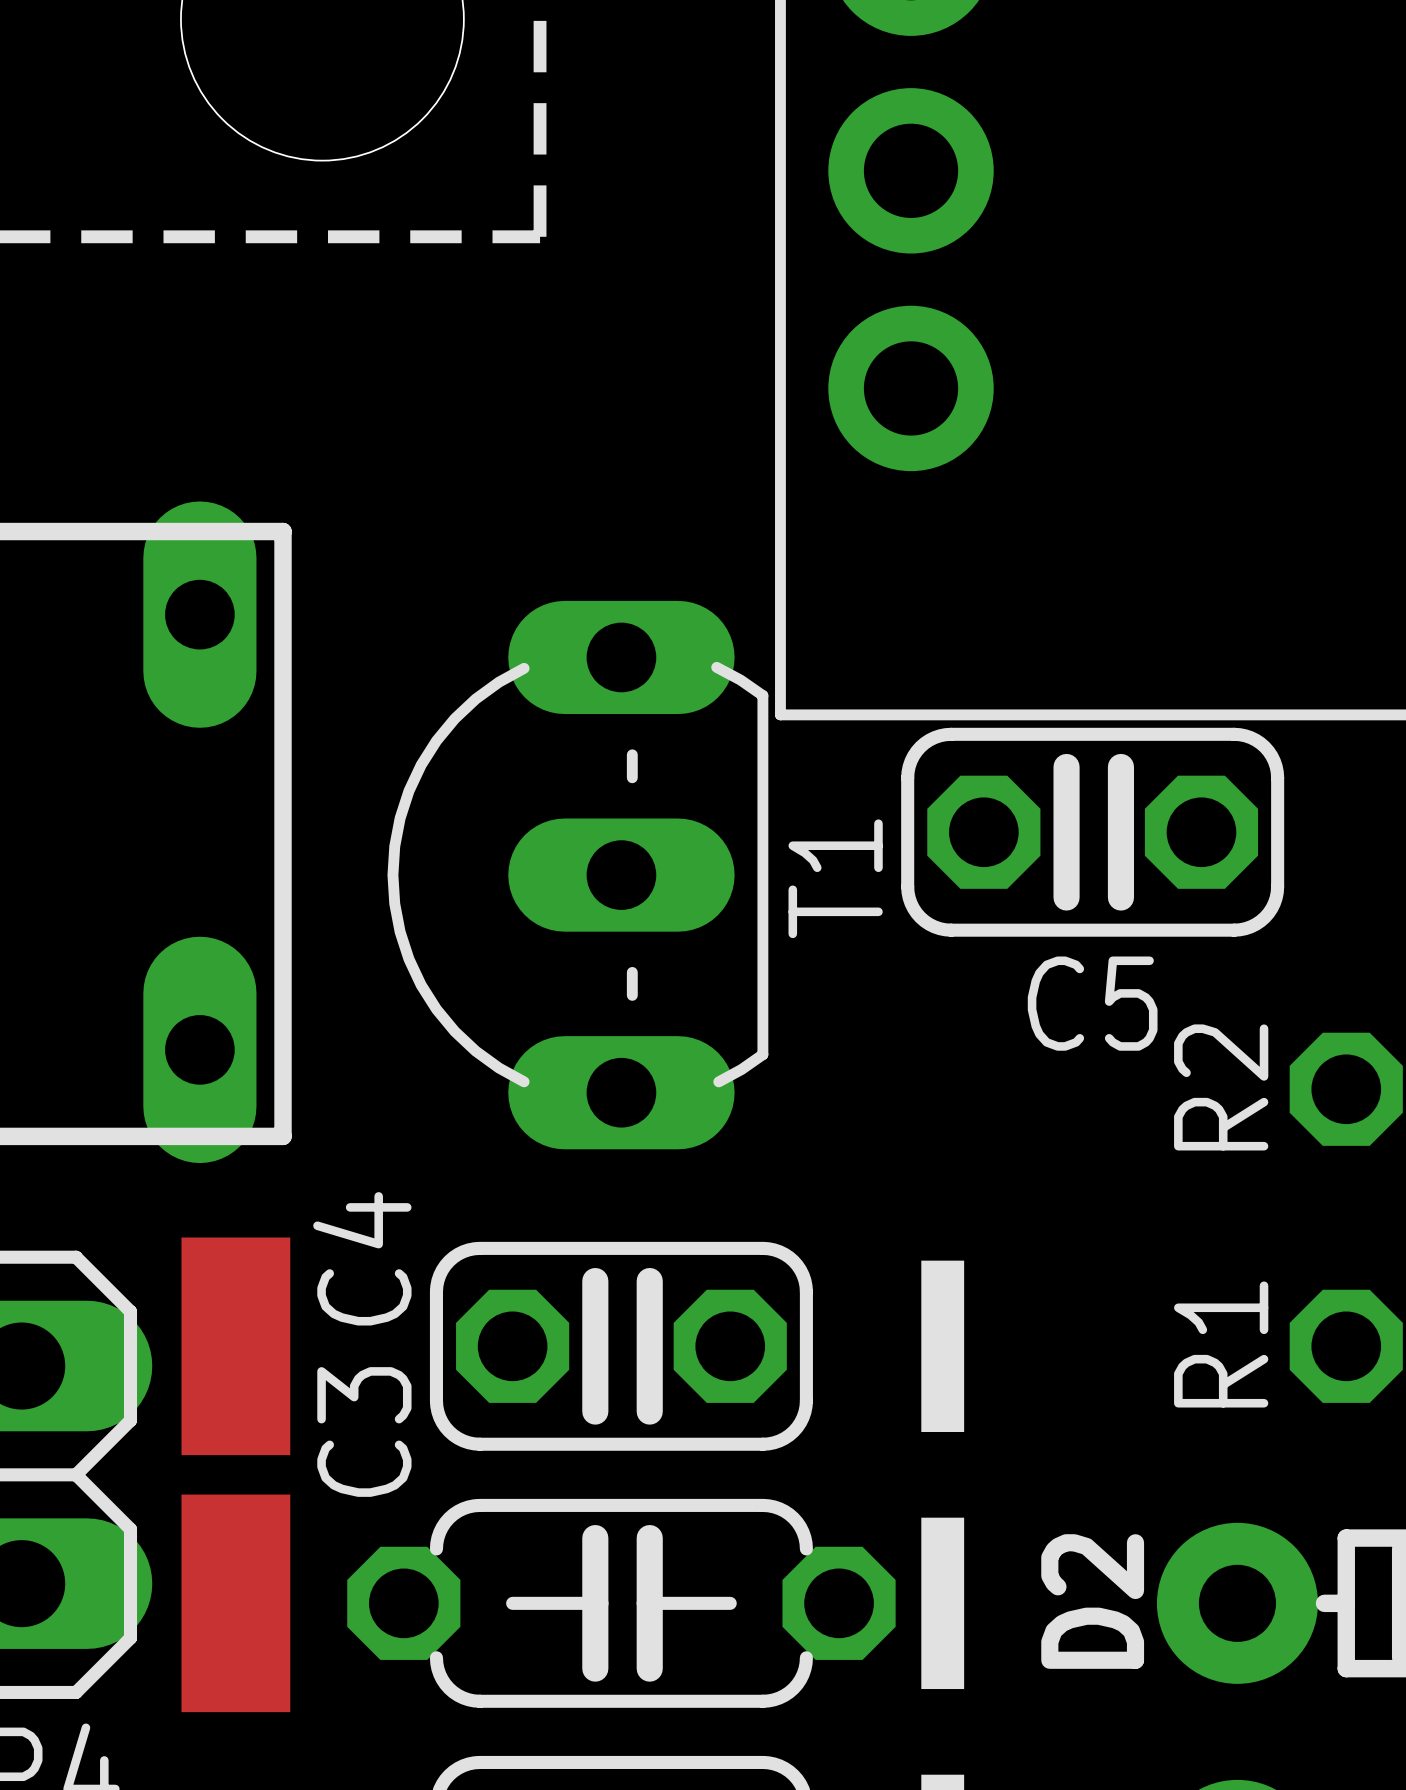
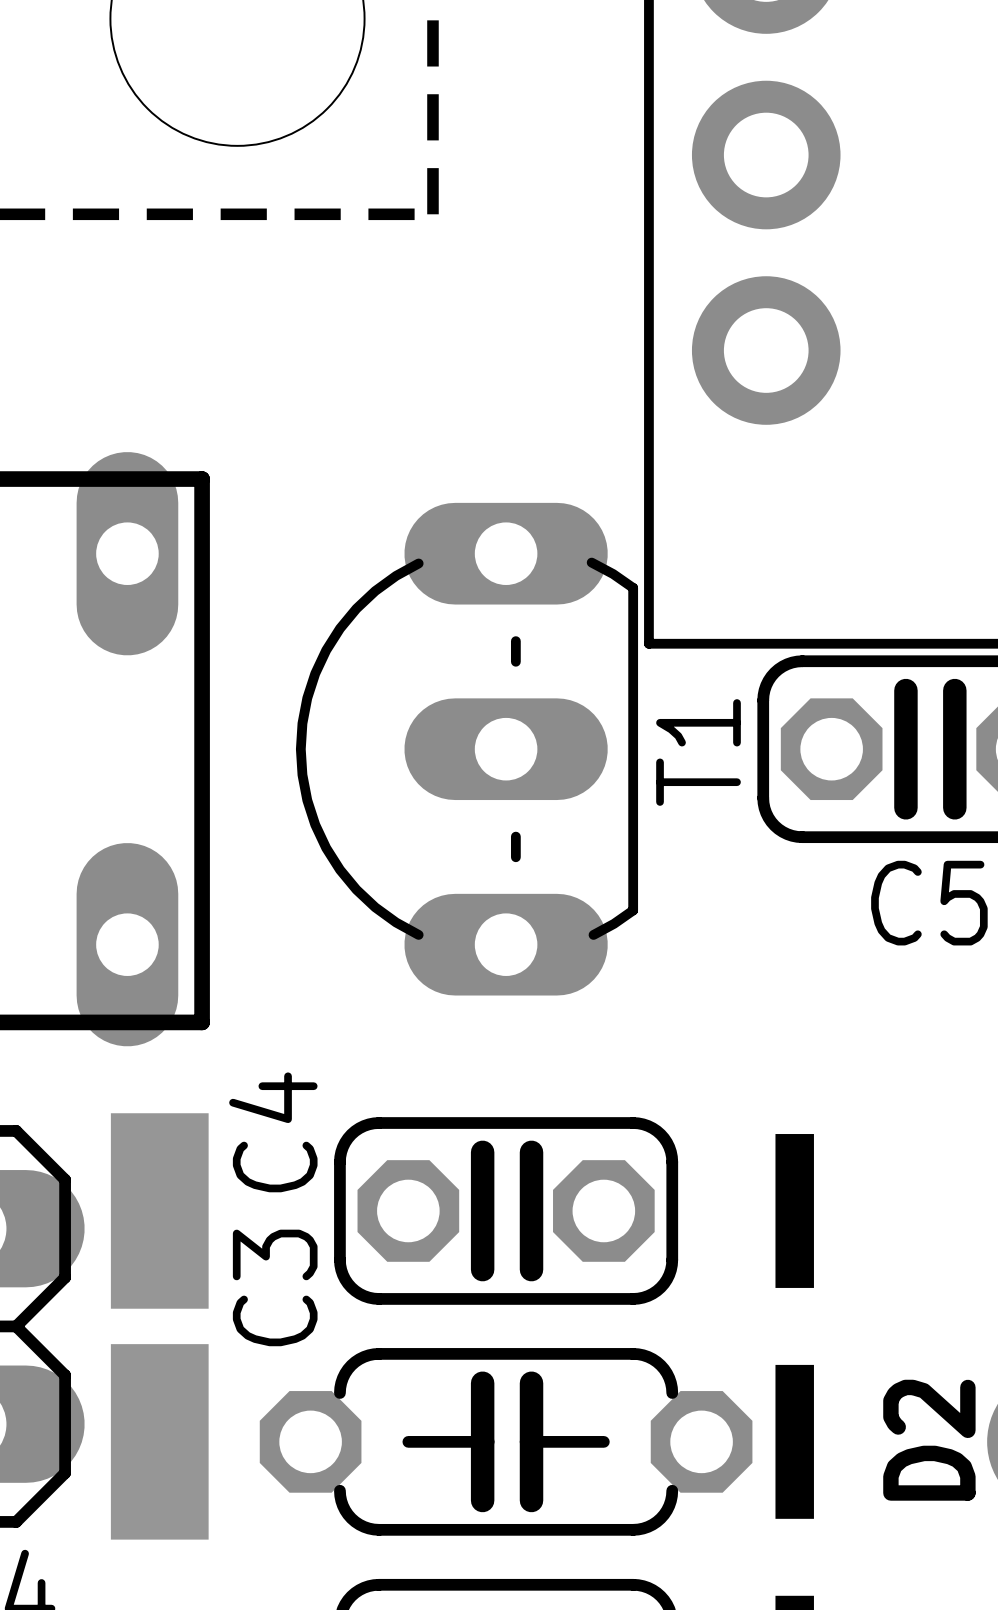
T1 position: (577, 875) -> (467, 749)

